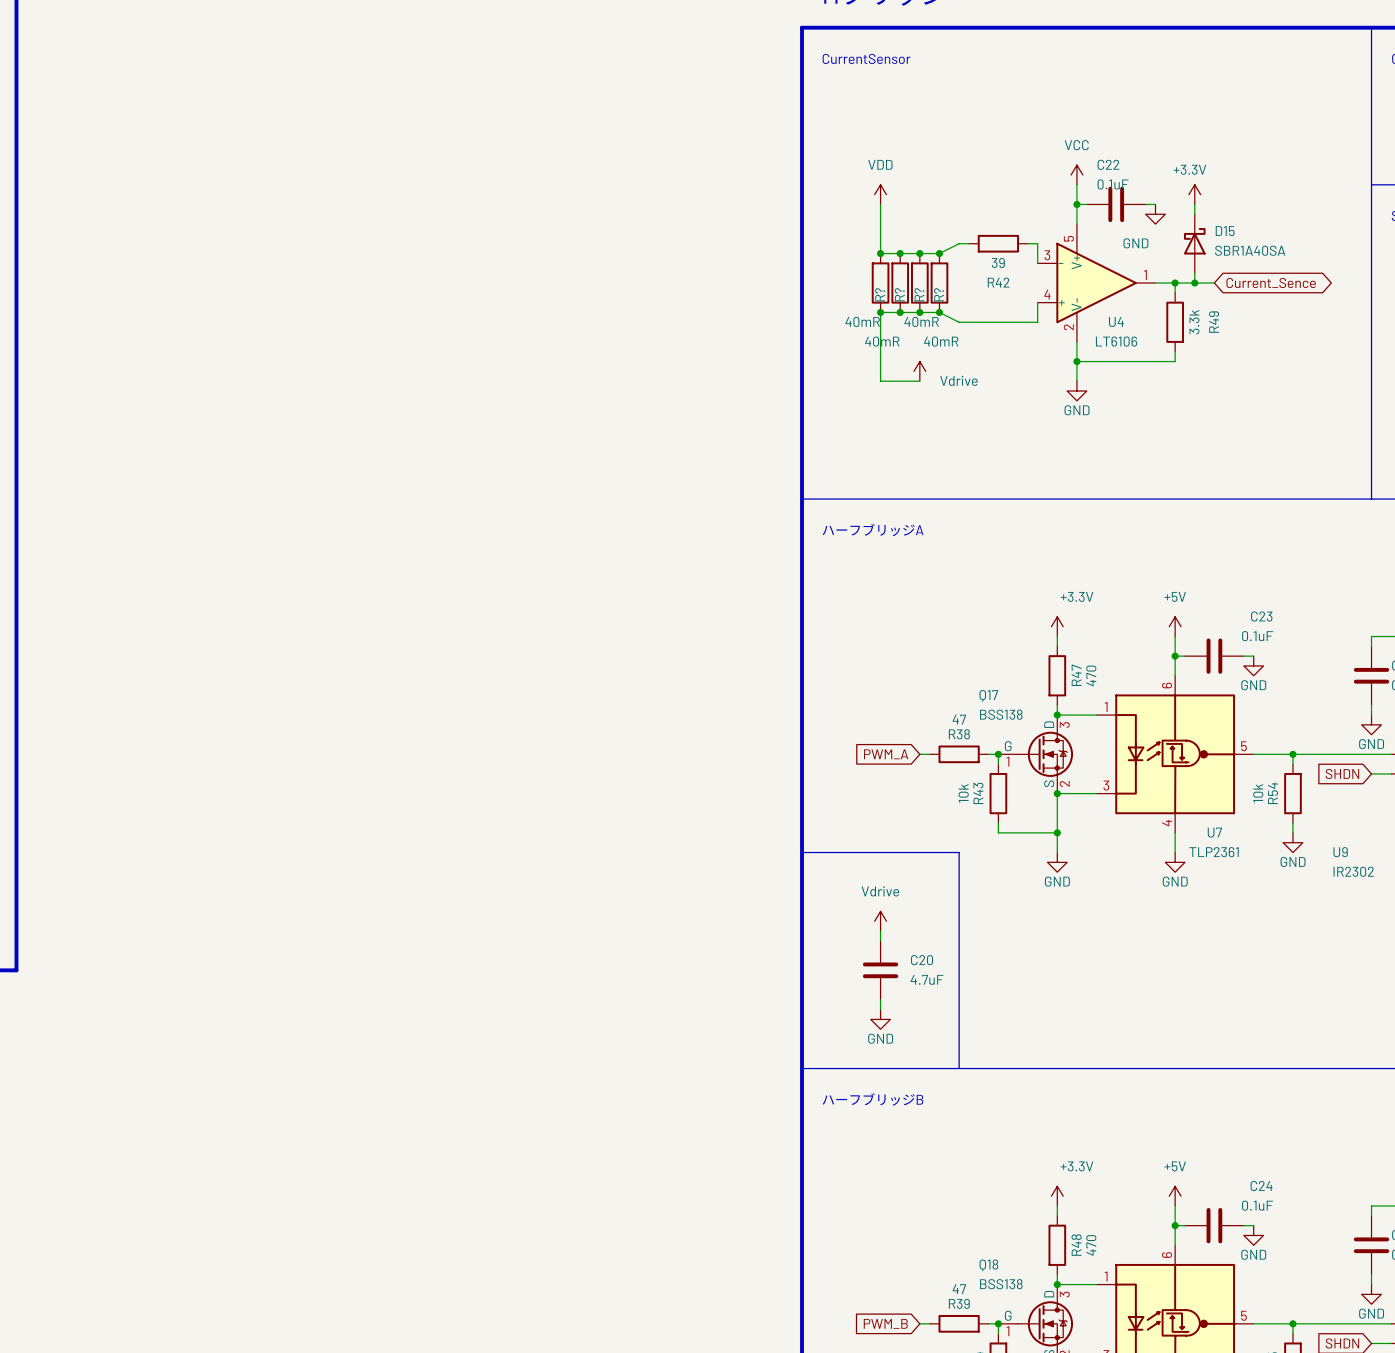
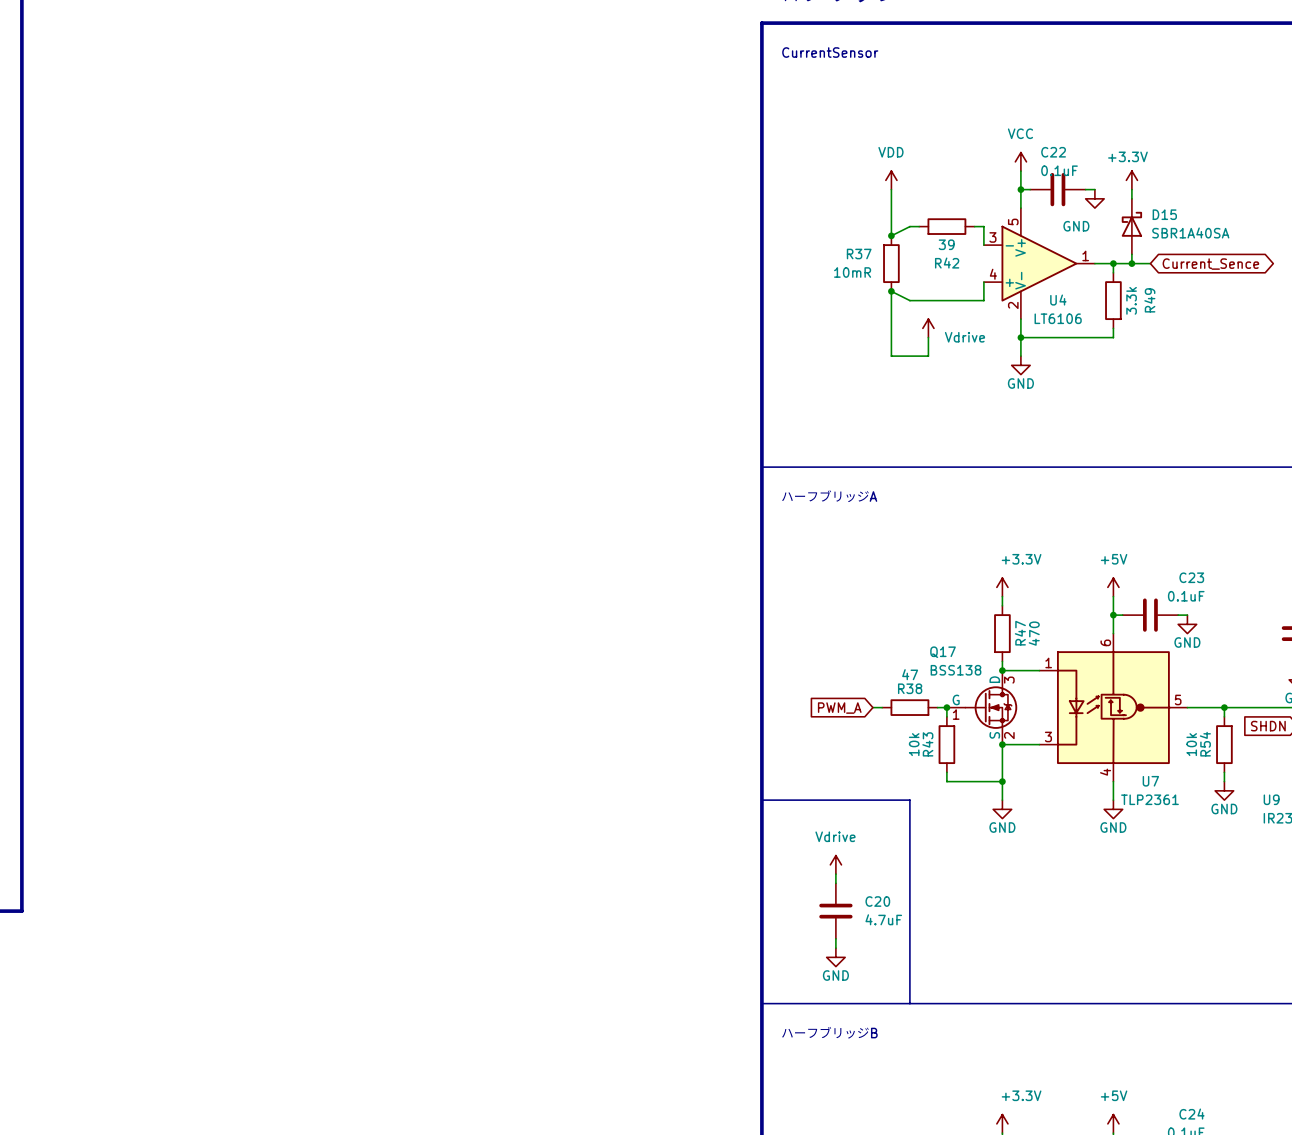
power symbol position: VDD (880, 194) -> VDD (891, 180)
wire: (880, 204) (880, 253) (939, 253) -> (891, 189) (891, 235)
junction: (880, 253) -> none
junction: (900, 253) -> none
junction: (919, 253) -> none
R?: 40mR (880, 283) -> none
R?: 40mR (900, 283) -> none
R?: 40mR (919, 283) -> none
R? name: R? (939, 294) -> R37 (859, 254)
junction: (880, 312) -> none
junction: (900, 312) -> none
junction: (919, 312) -> none
wire: (939, 312) (880, 312) (880, 381) (919, 381) -> (891, 291) (891, 356) (928, 356) (928, 337)
R? value: 40mR (941, 341) -> 10mR (852, 272)
power symbol position: Vdrive (919, 371) -> Vdrive (928, 328)

